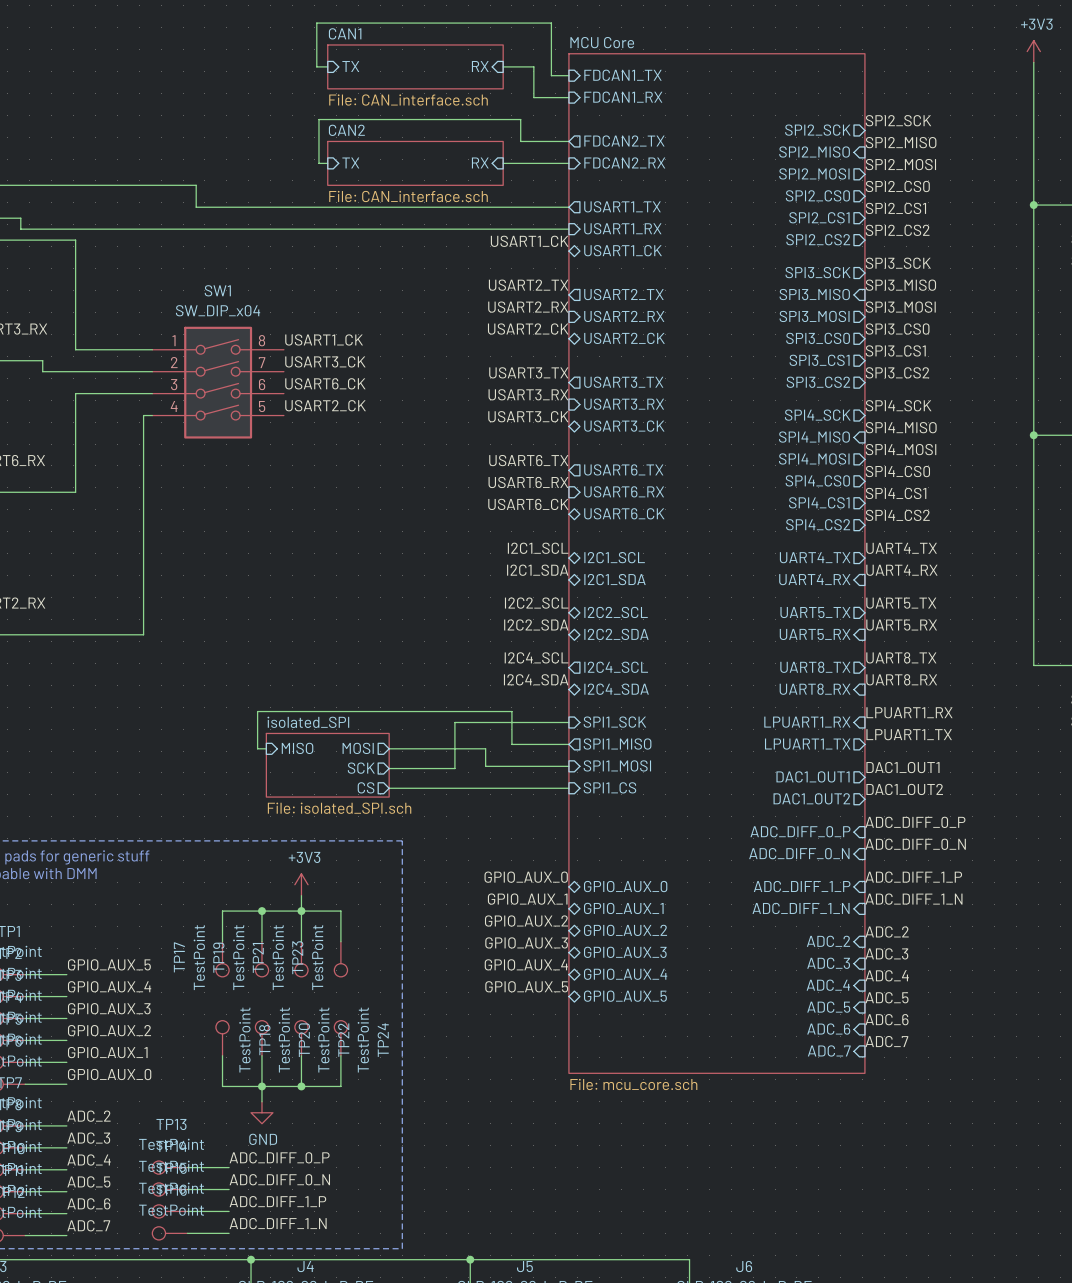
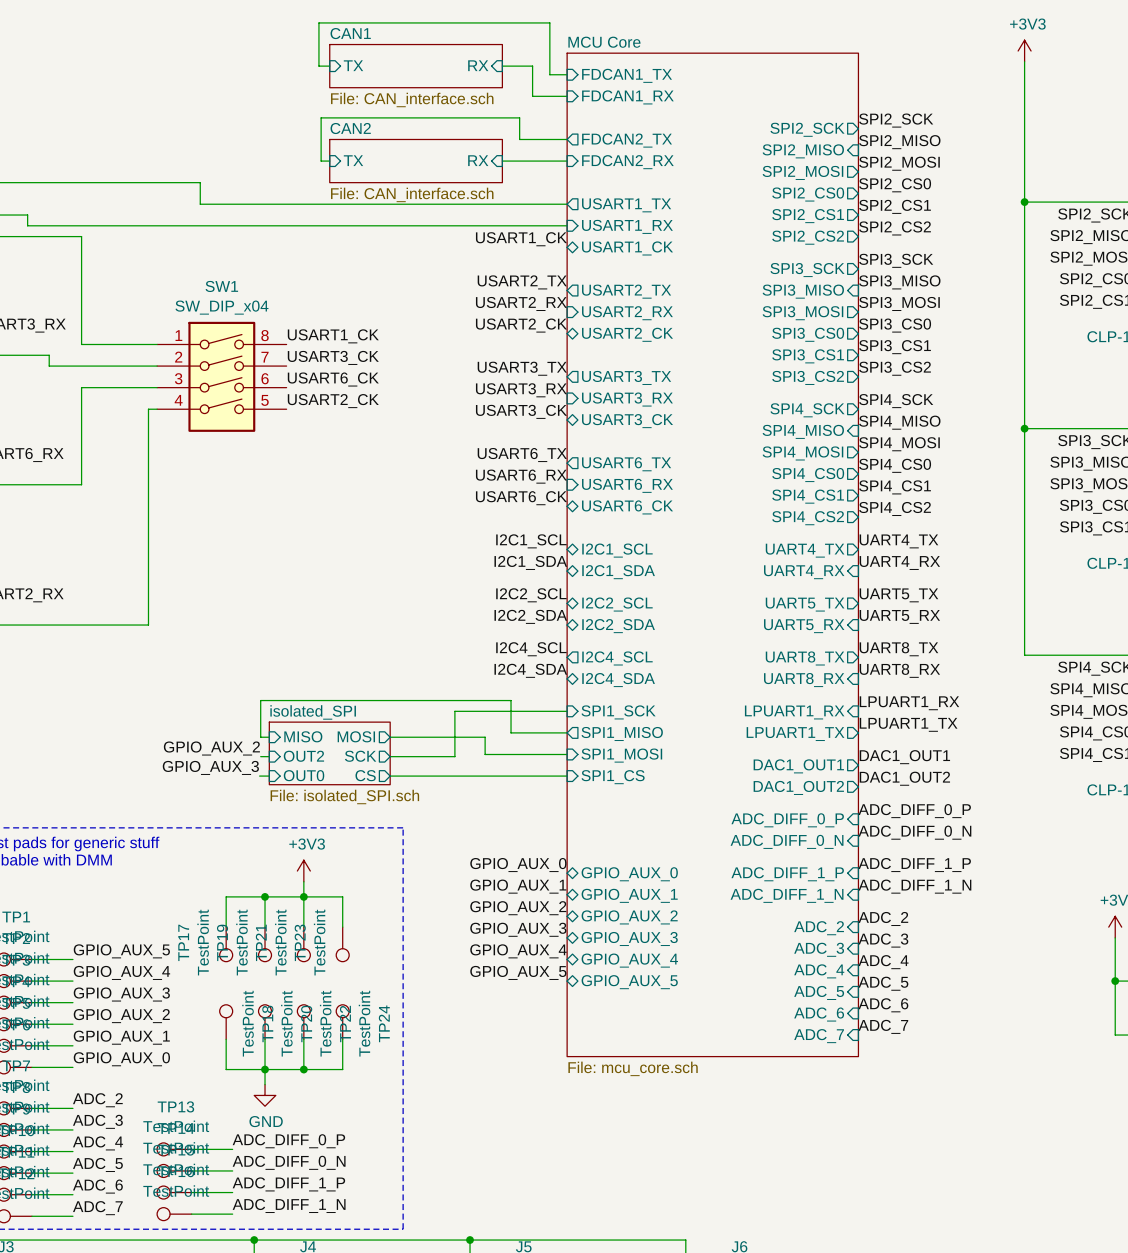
label: none -> GPIO_AUX_2 (211, 748)
wire: none -> (260, 756) (269, 756)
sheet pin: none -> OUT2 (303, 756)
label: none -> GPIO_AUX_3 (210, 767)
sheet pin: none -> OUT0 (304, 775)
wire: none -> (259, 776) (269, 776)

